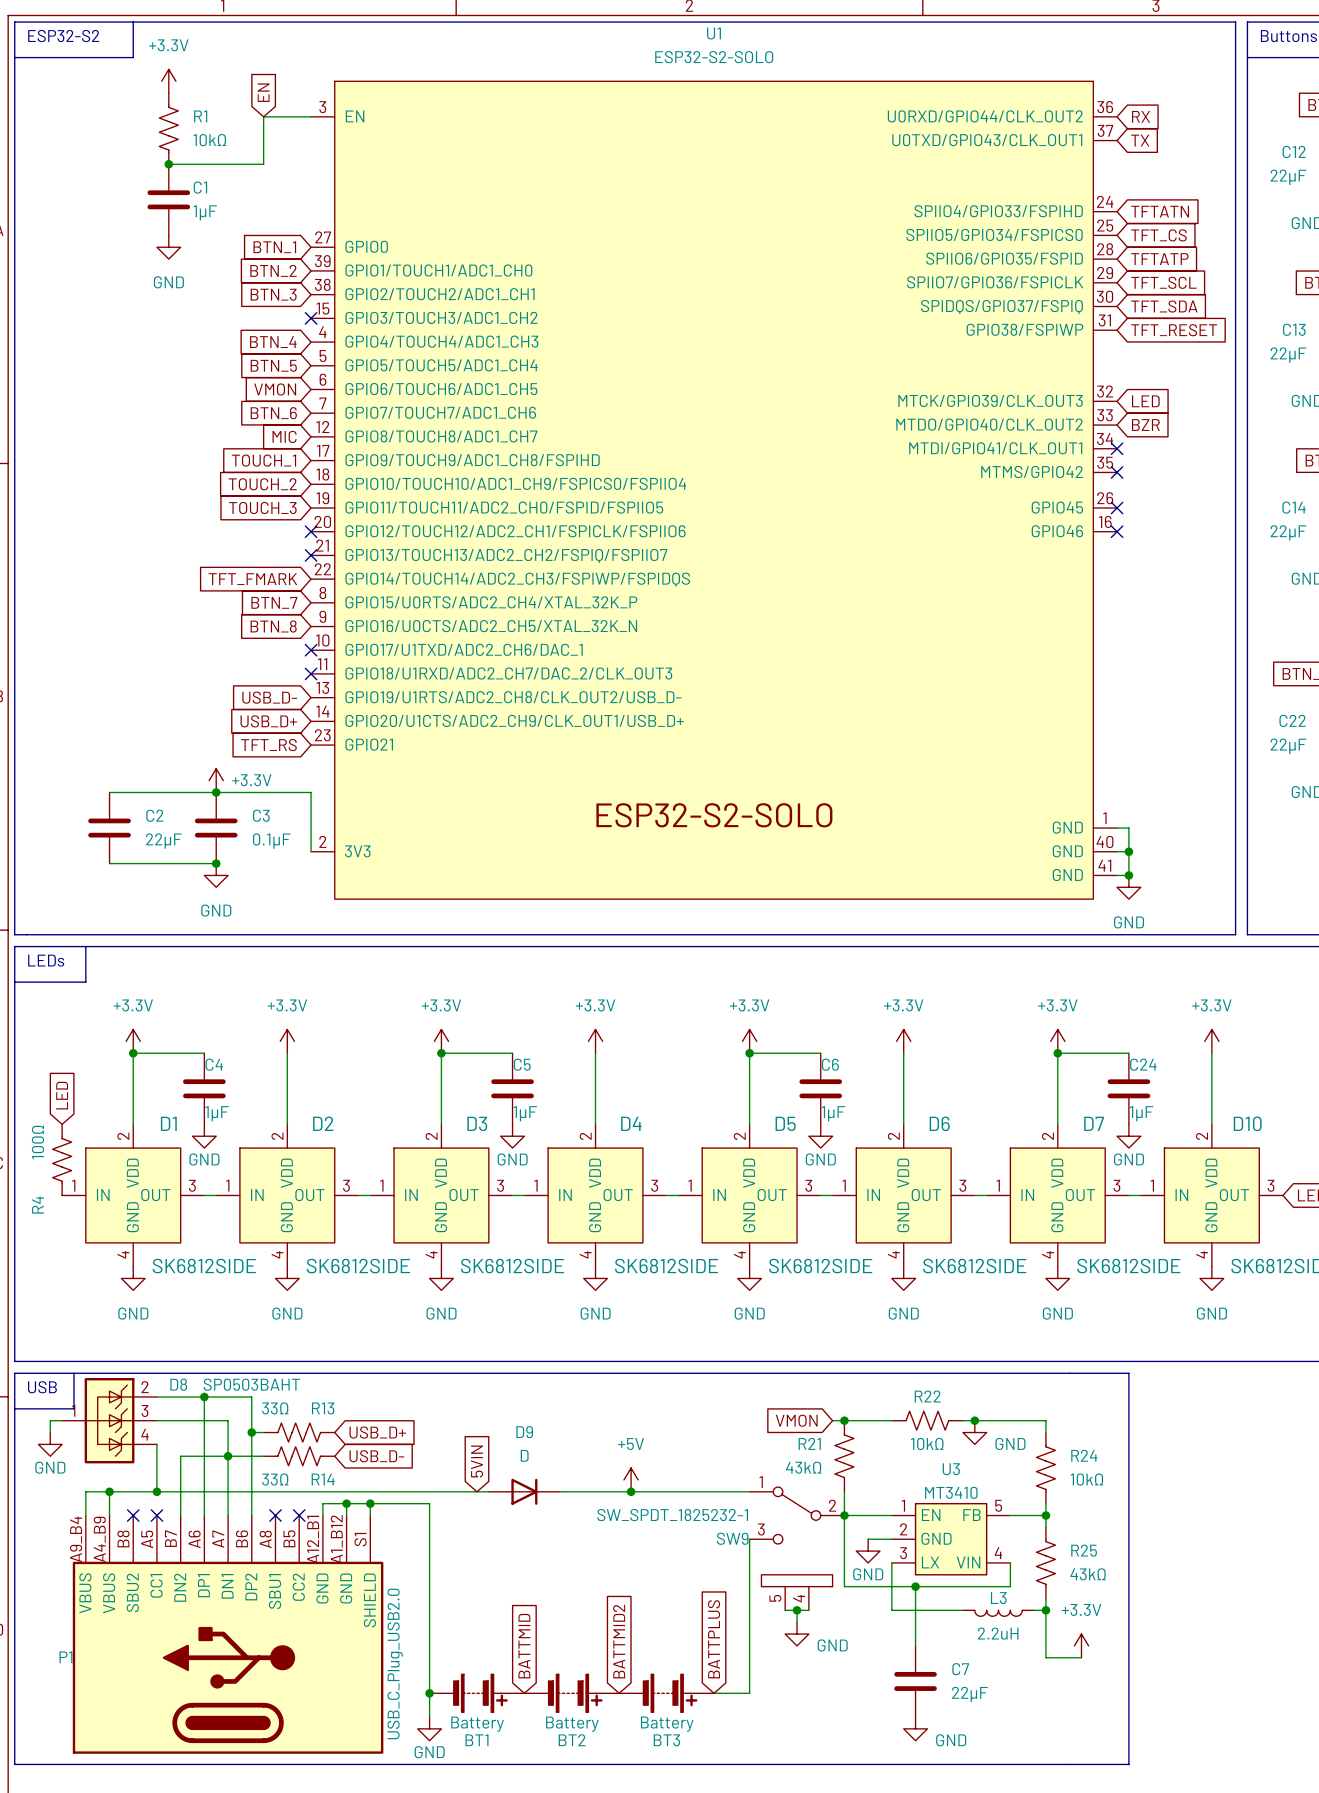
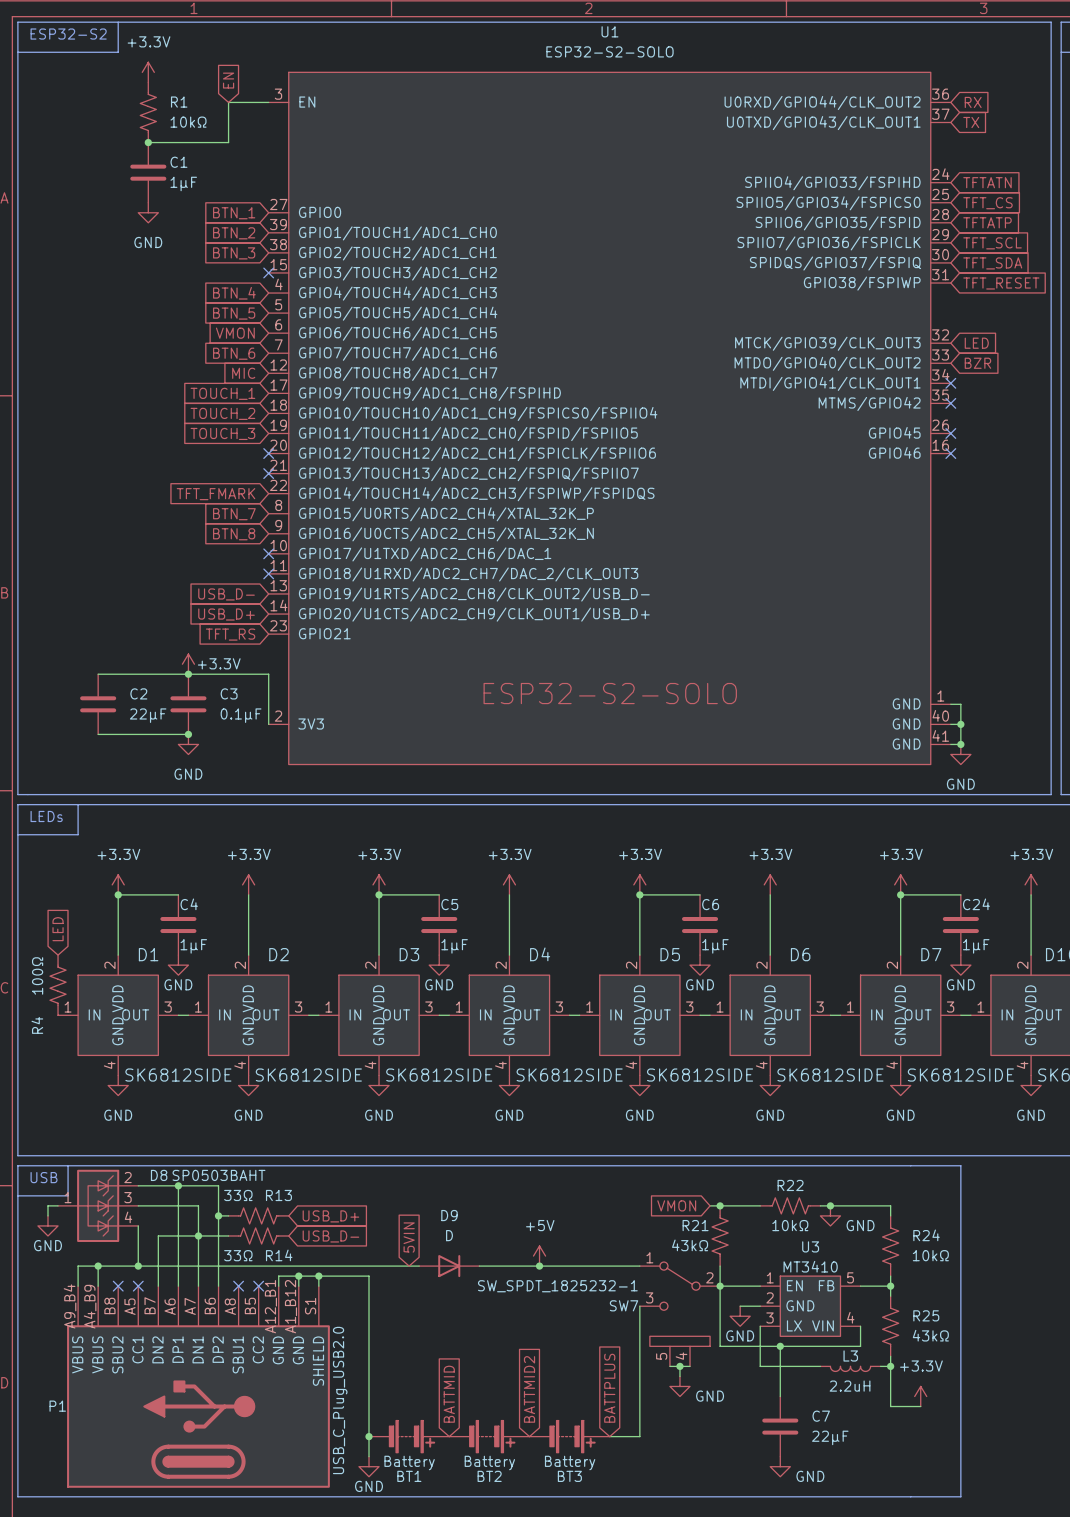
SW9 name: SW9 (732, 1538) -> SW7 (624, 1305)

